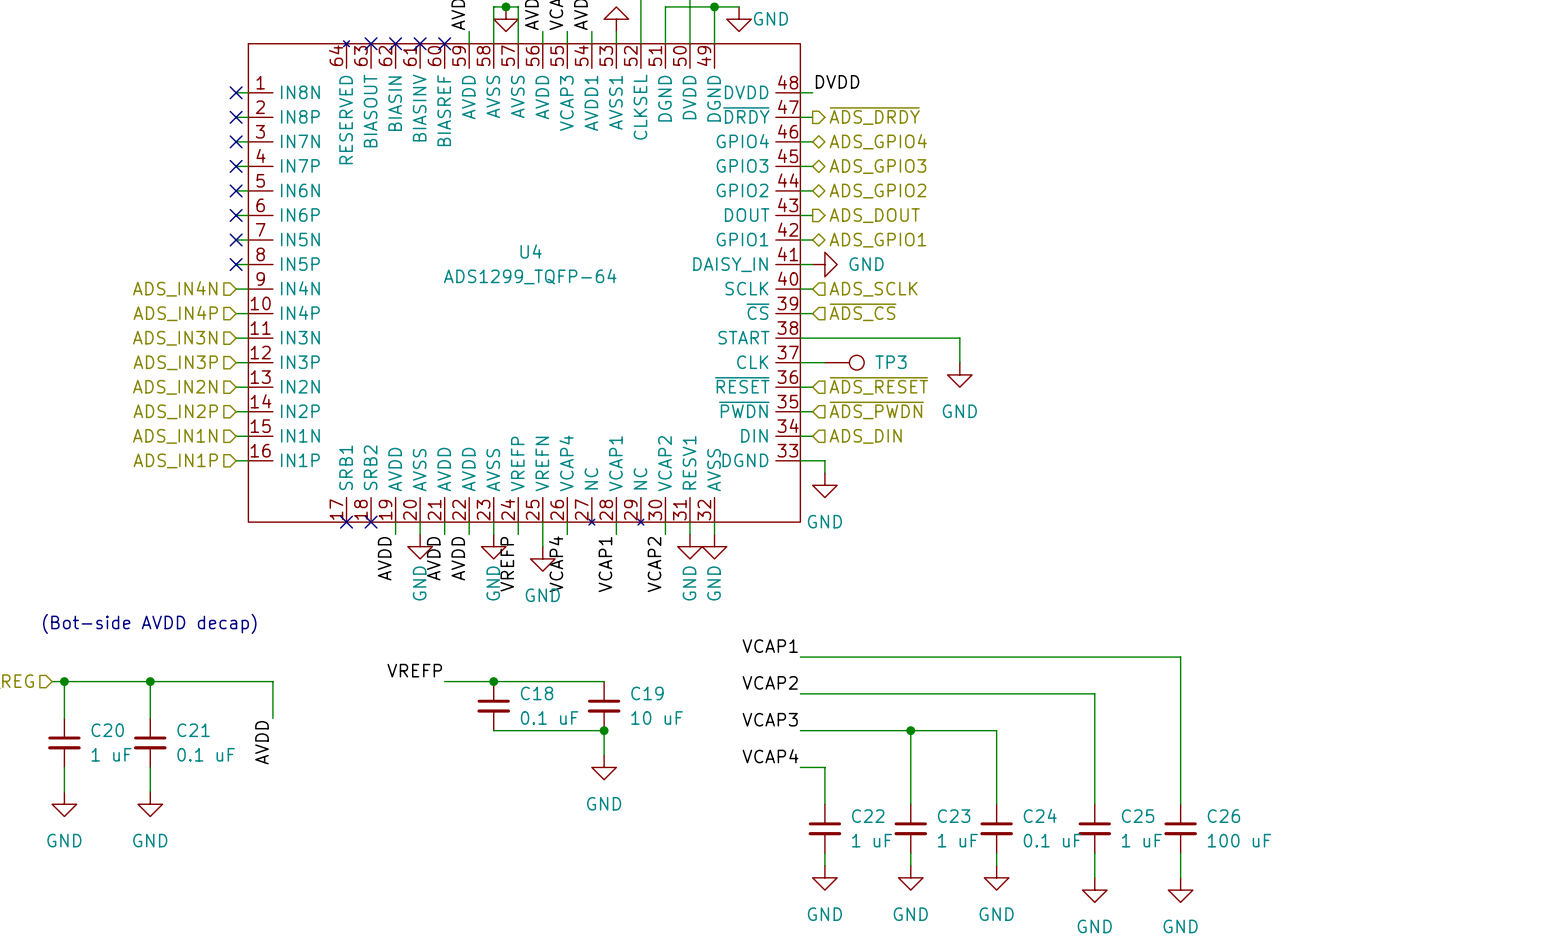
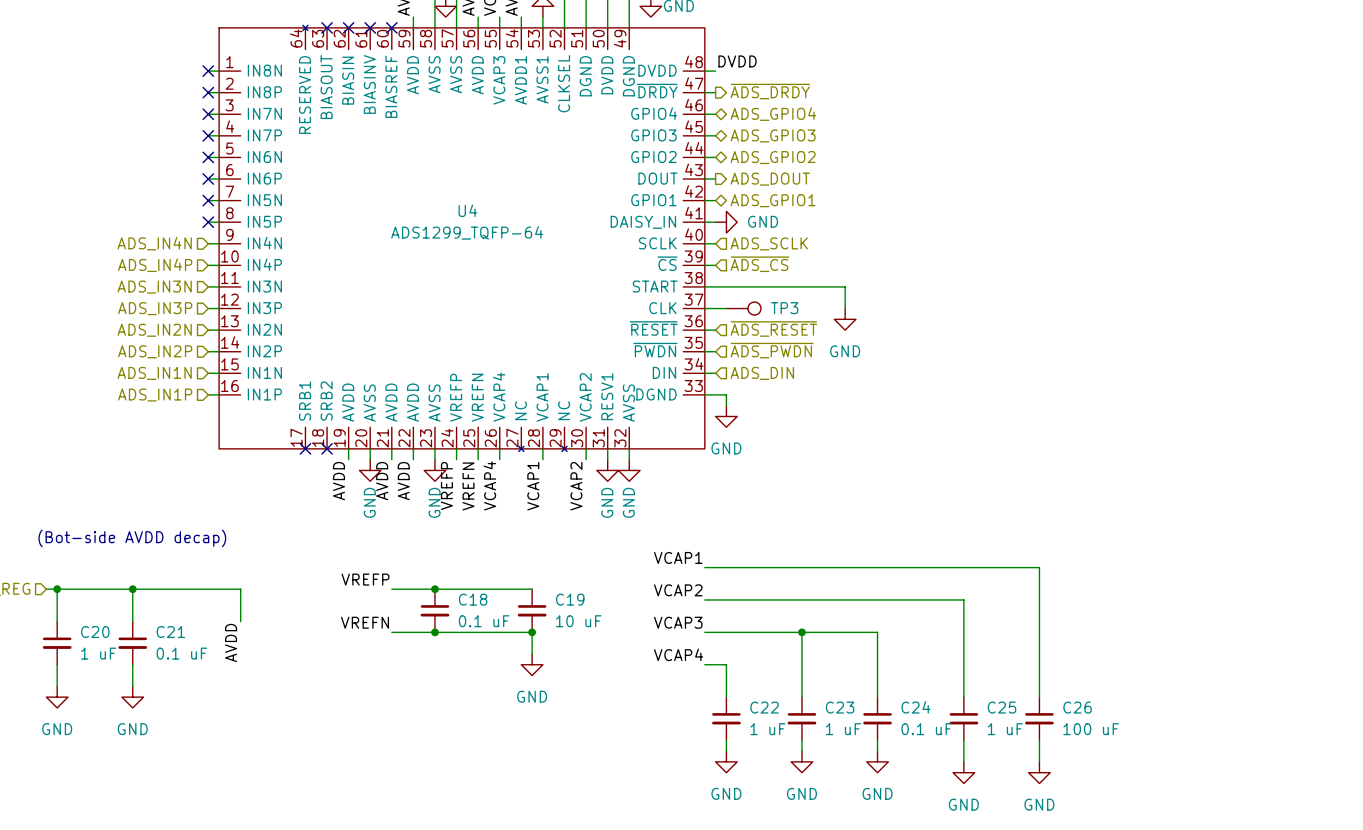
wire: (542, 534) (542, 546) -> none
power symbol: GND (542, 558) -> none
label: none -> VREFN (468, 486)
label: none -> VREFN (364, 622)
wire: none -> (391, 632) (434, 632)
junction: none -> (434, 632)

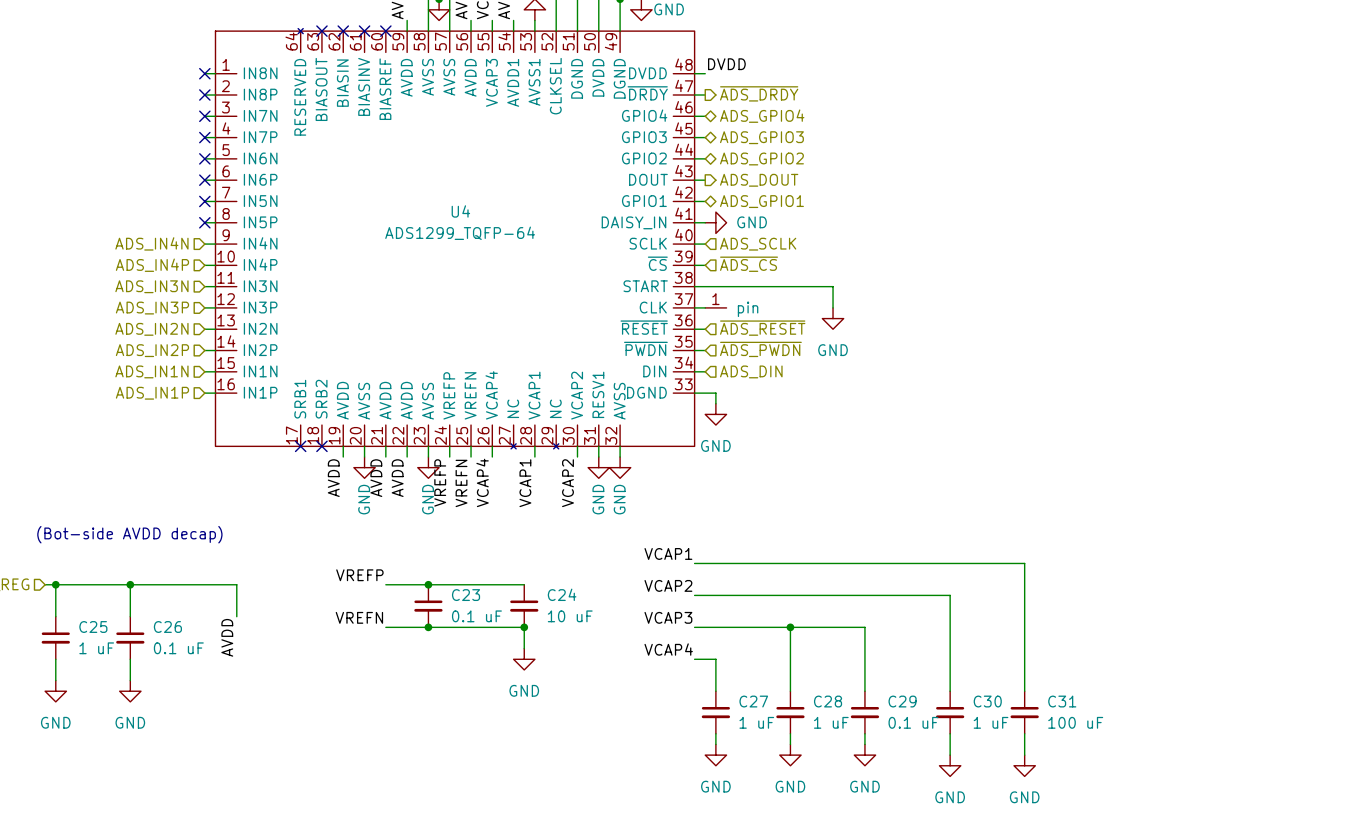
part: none -> (715, 307)
TP3: (743, 308) -> none
C18 name: C18 (473, 599) -> C23 (466, 595)
C19 name: C19 (570, 599) -> C24 (562, 594)
C20 name: C20 (95, 632) -> C25 (93, 627)
C21 name: C21 (170, 632) -> C26 (167, 627)
C22 name: C22 (764, 707) -> C27 (753, 701)
C23 name: C23 (840, 707) -> C28 (828, 701)
C24 name: C24 (915, 707) -> C29 (902, 701)
C25 name: C25 (1002, 707) -> C30 (987, 701)
C26 name: C26 (1077, 707) -> C31 (1062, 701)

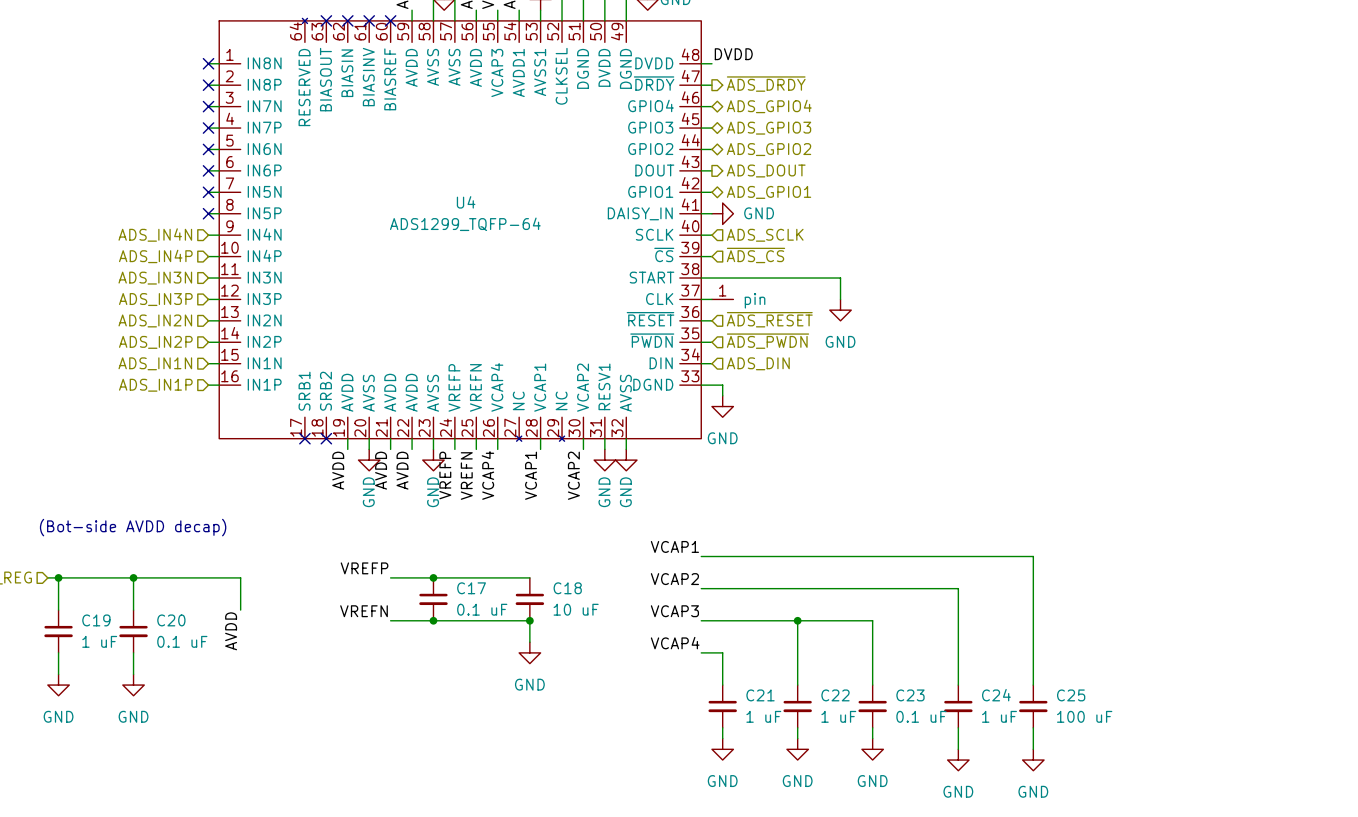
C24 name: C24 (562, 594) -> C18 (567, 588)
C23 name: C23 (466, 595) -> C17 (471, 588)
C25 name: C25 (93, 627) -> C19 (96, 620)
C26 name: C26 (167, 627) -> C20 (171, 620)
C27 name: C27 (753, 701) -> C21 (760, 695)
C28 name: C28 (828, 701) -> C22 (835, 695)
C29 name: C29 (902, 701) -> C23 (910, 695)
C30 name: C30 (987, 701) -> C24 (996, 695)
C31 name: C31 (1062, 701) -> C25 (1071, 695)

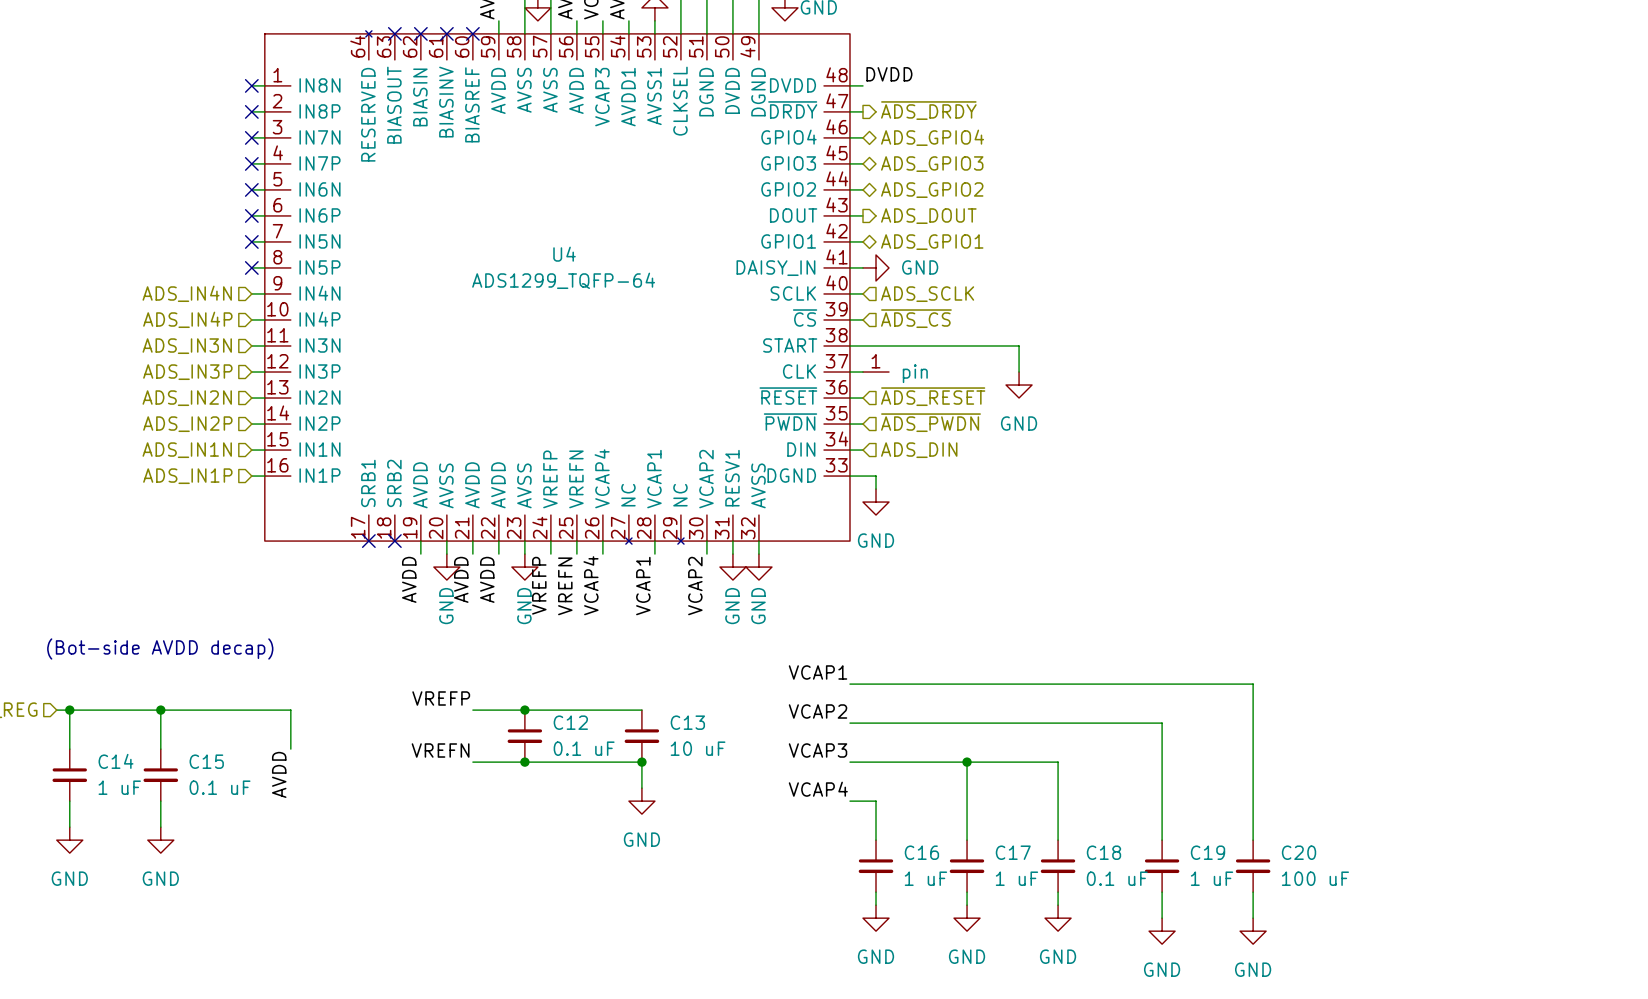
C17 name: C17 (471, 588) -> C12 (570, 722)
C18 name: C18 (567, 588) -> C13 (687, 722)
C19 name: C19 (96, 620) -> C14 (116, 761)
C20 name: C20 (171, 620) -> C15 (206, 761)
C21 name: C21 (760, 695) -> C16 (921, 852)
C22 name: C22 (835, 695) -> C17 (1013, 852)
C23 name: C23 (910, 695) -> C18 (1103, 852)
C24 name: C24 (996, 695) -> C19 (1208, 852)
C25 name: C25 (1071, 695) -> C20 (1299, 852)

